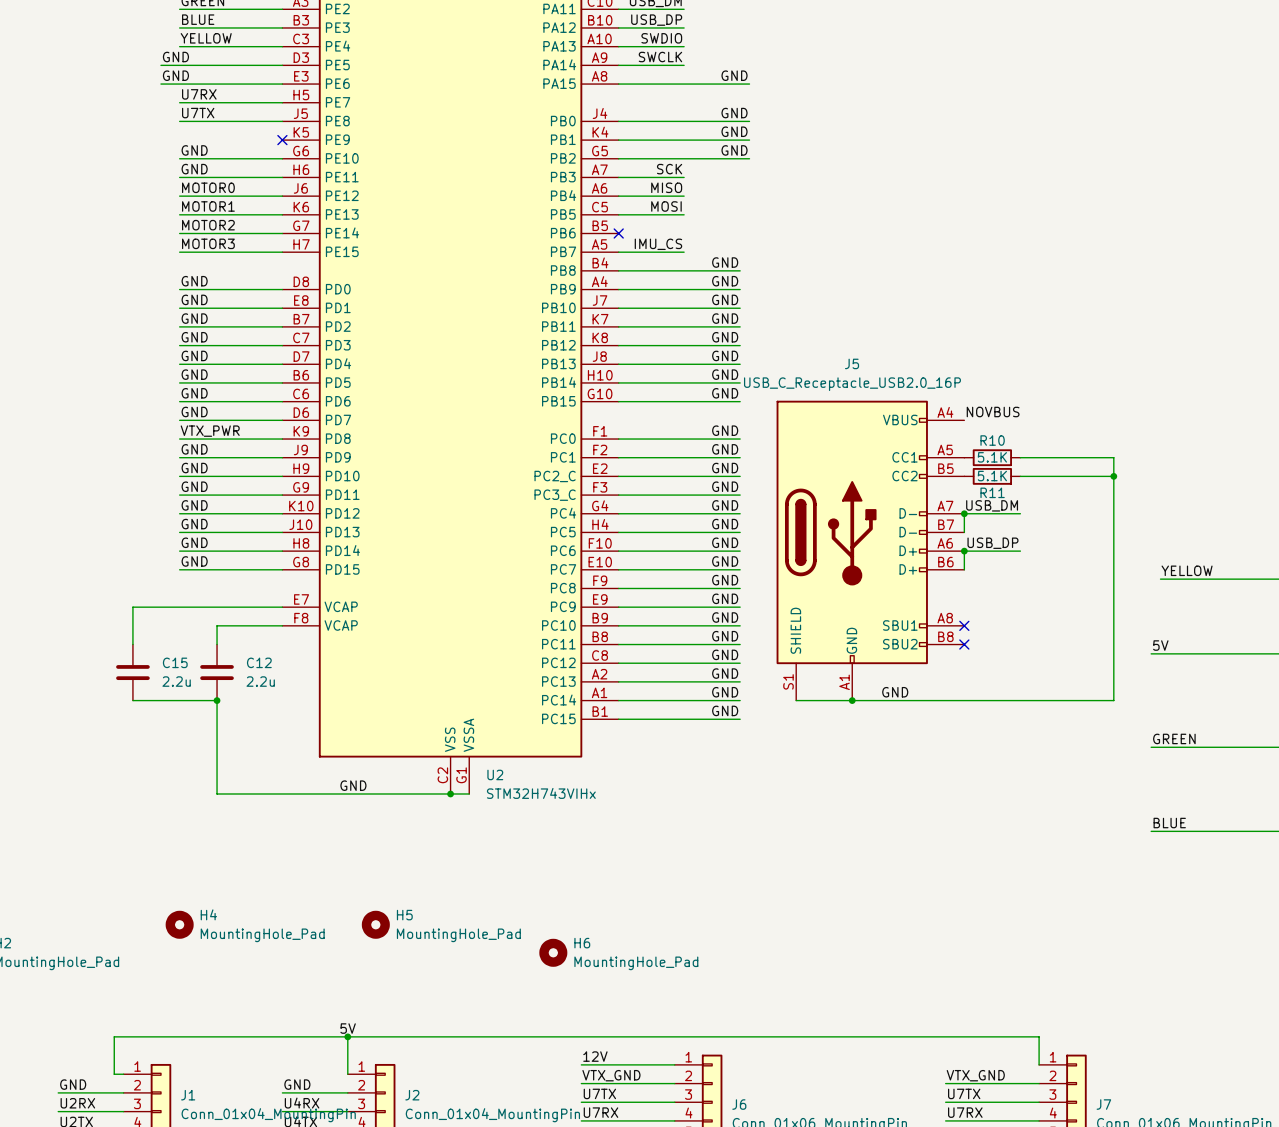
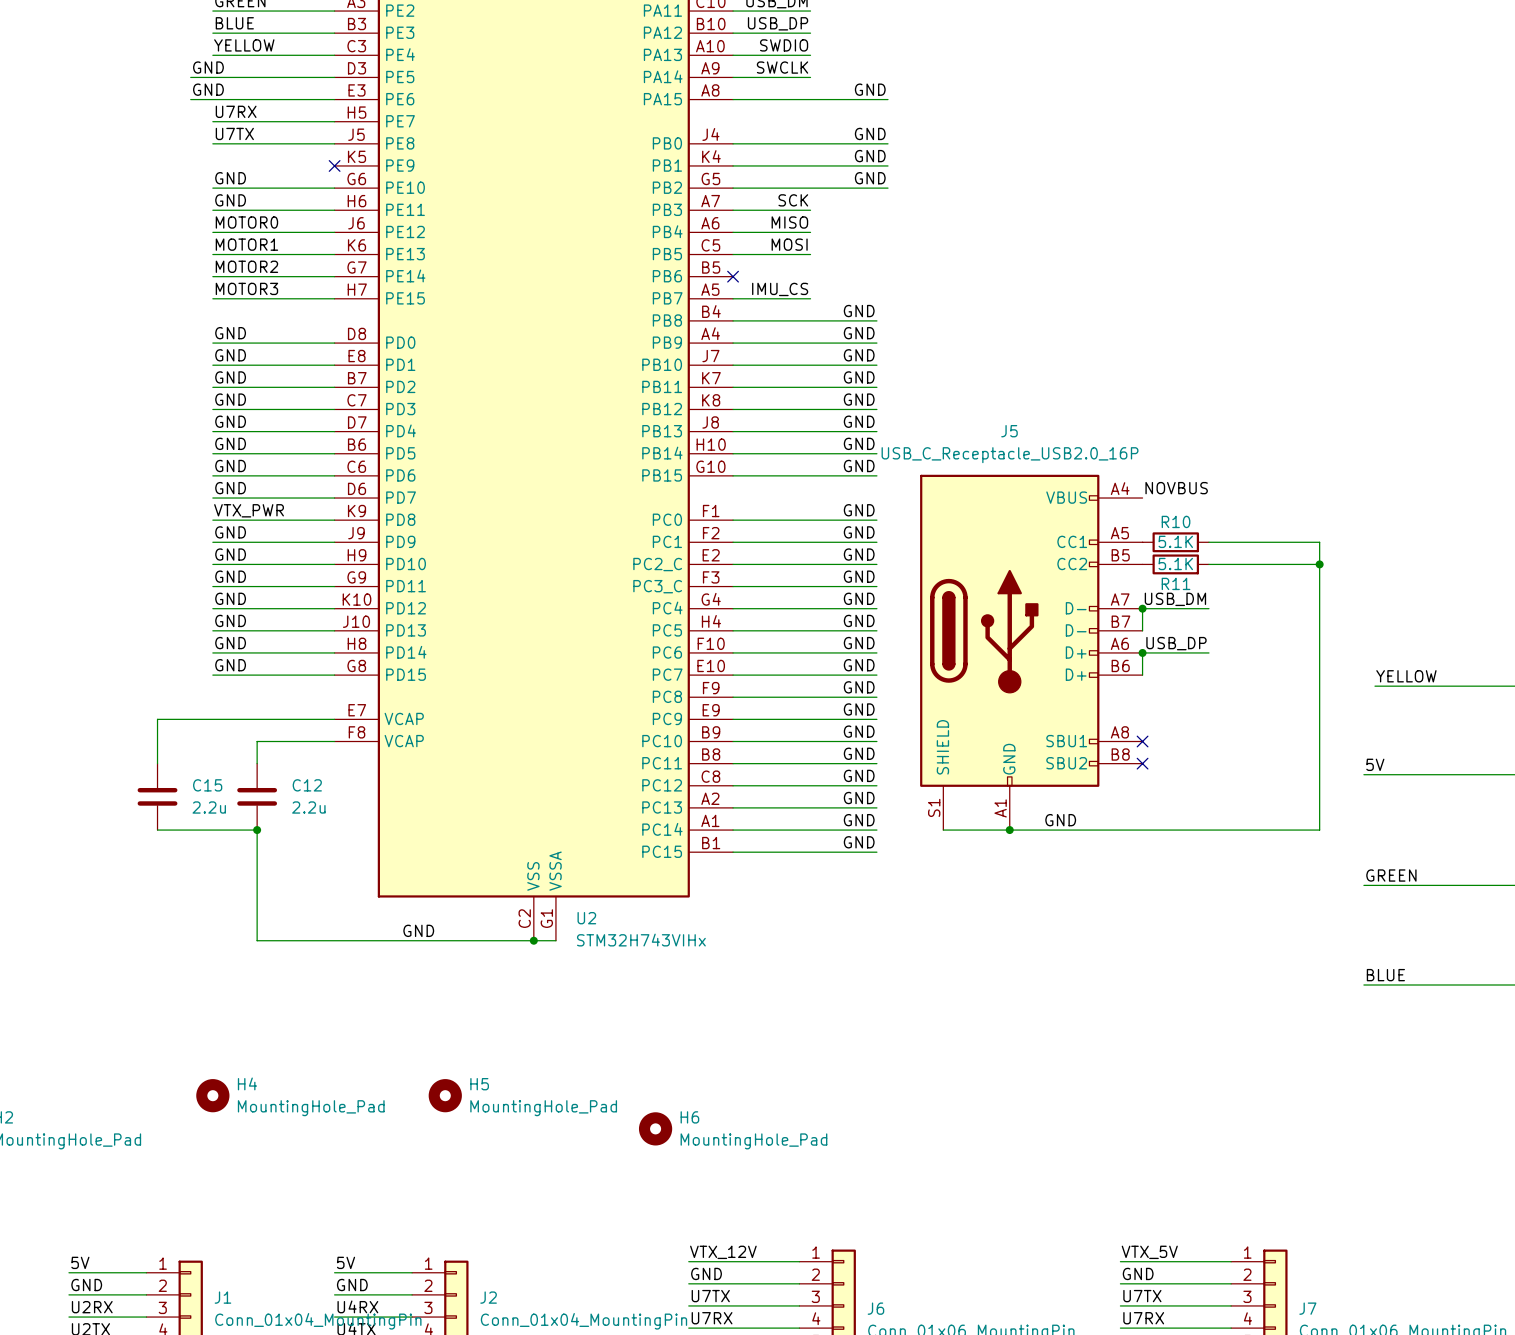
label position: 5V (348, 1028) -> 5V (346, 1262)
wire: (347, 1036) (347, 1074) -> (334, 1272) (412, 1272)
junction: (347, 1036) -> none
label: 12V (595, 1056) -> VTX_12V (723, 1252)
label: none -> VTX_5V (1149, 1252)
wire: (1039, 1064) (1039, 1036) (114, 1036) (114, 1074) -> (1231, 1261) (1120, 1261)
label: none -> 5V (80, 1262)
wire: none -> (68, 1272) (135, 1272)
label: VTX_GND (611, 1075) -> GND (706, 1273)
label: VTX_GND (975, 1075) -> GND (1138, 1273)

